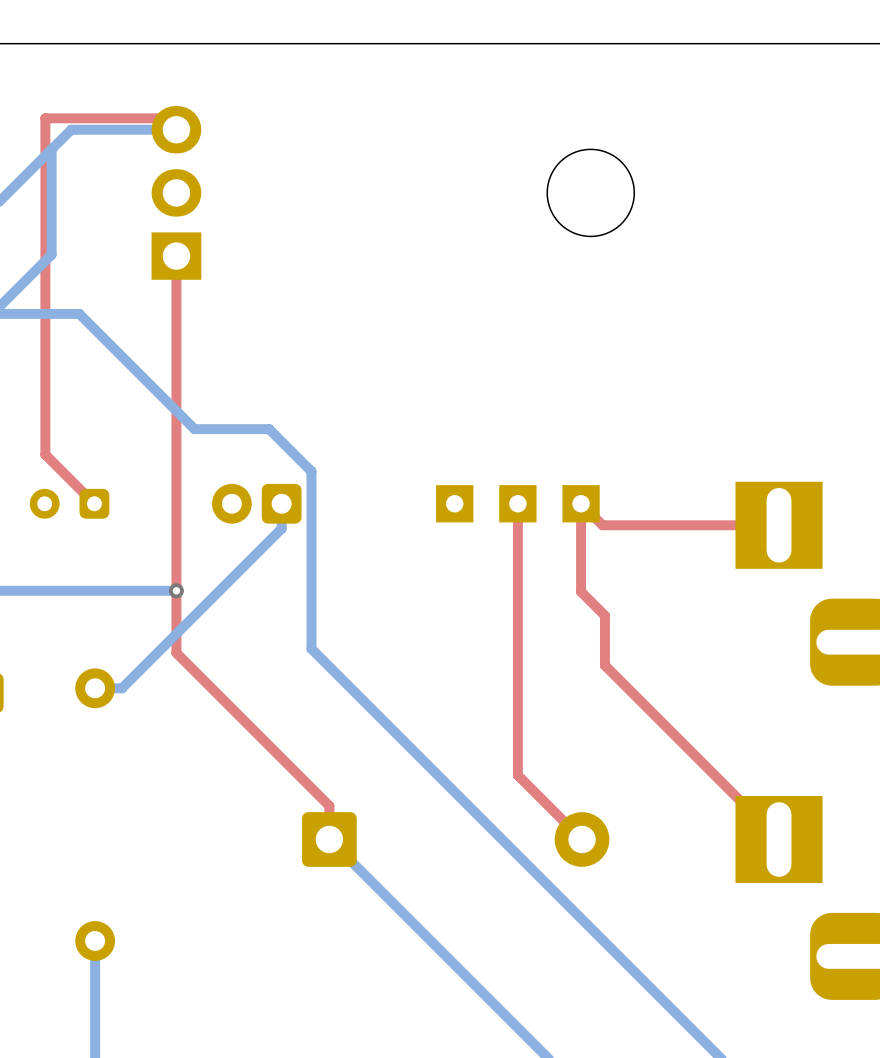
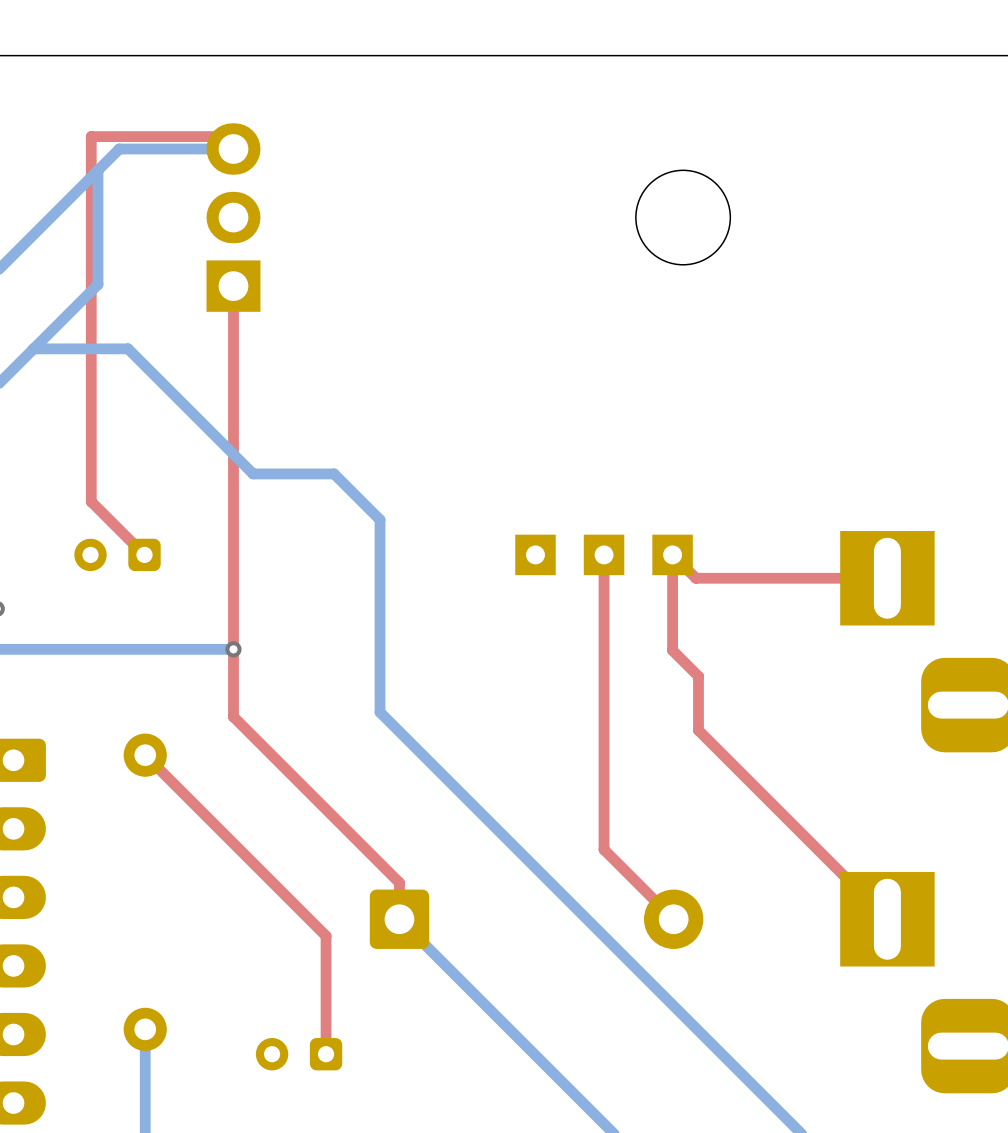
part: (256, 503) -> none
bottom track: (281, 503) (281, 528) (121, 688) (95, 688) -> none
top track: none -> (145, 755) (326, 935) (326, 1054)
part: none -> (299, 1054)

